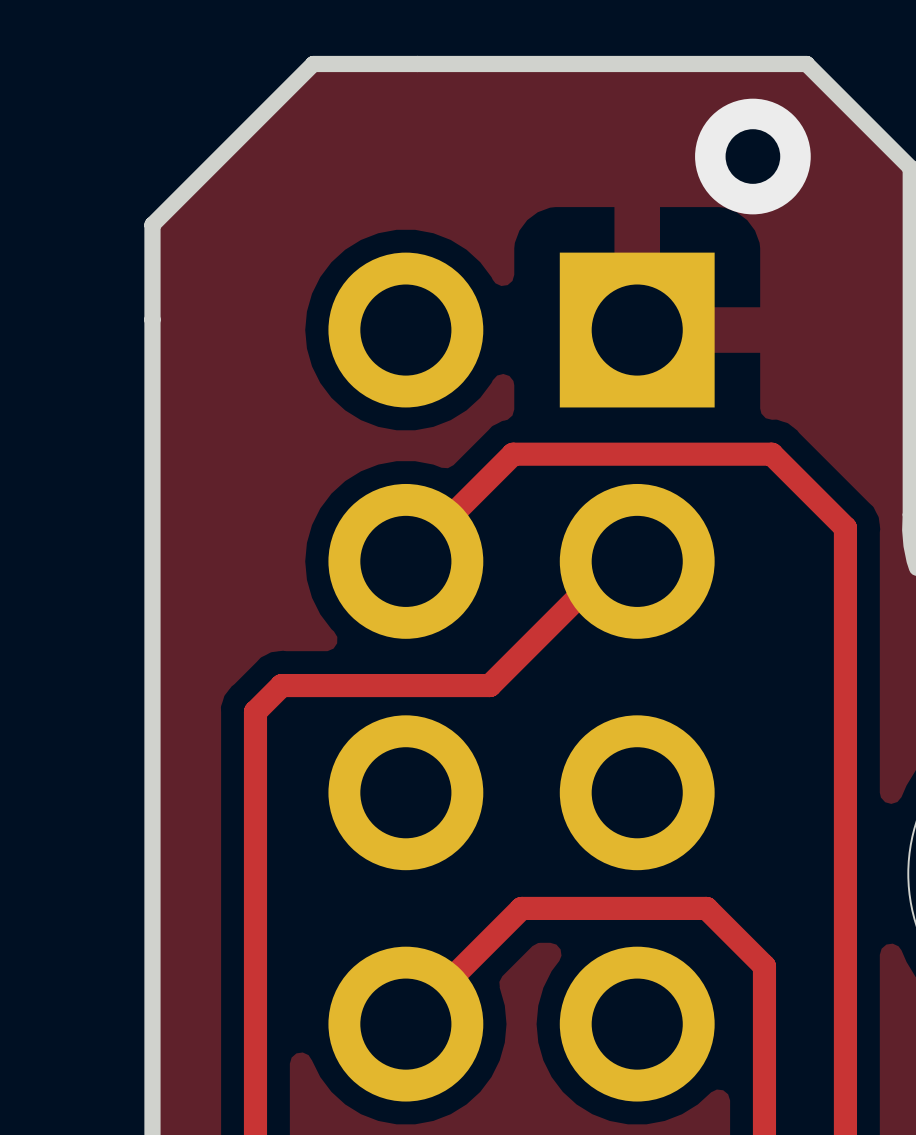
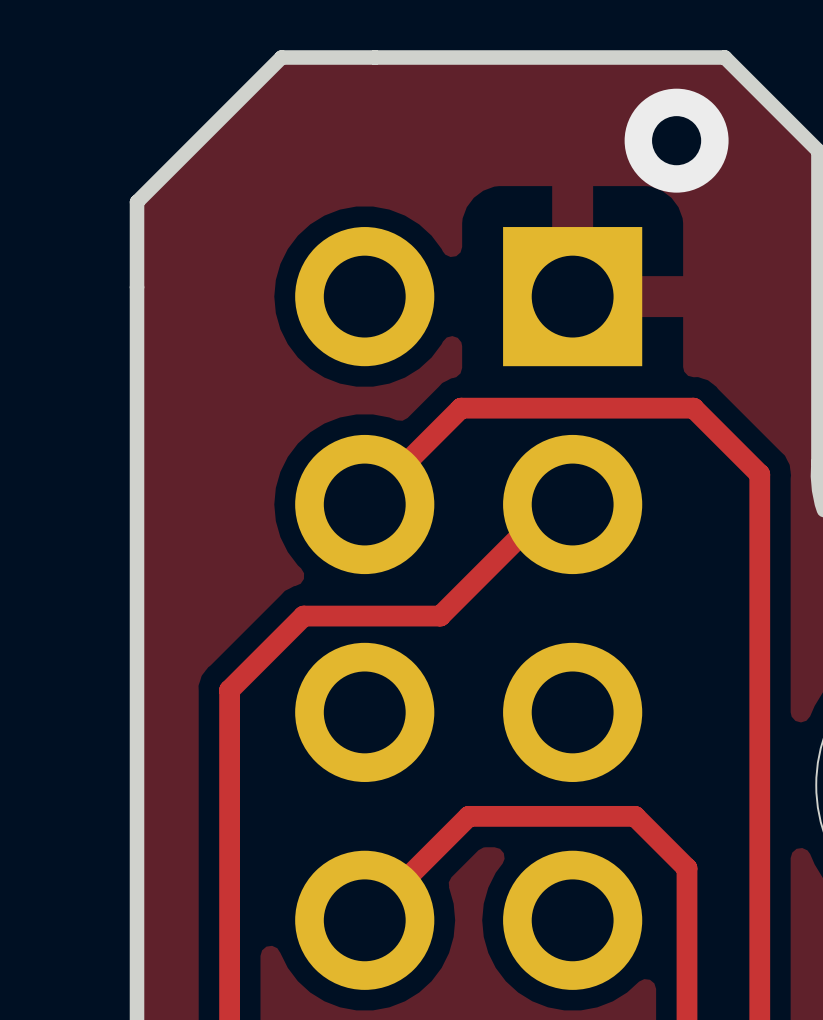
track: (337, 685) (281, 685) (255, 711) (255, 767) -> (303, 616) (229, 690)

